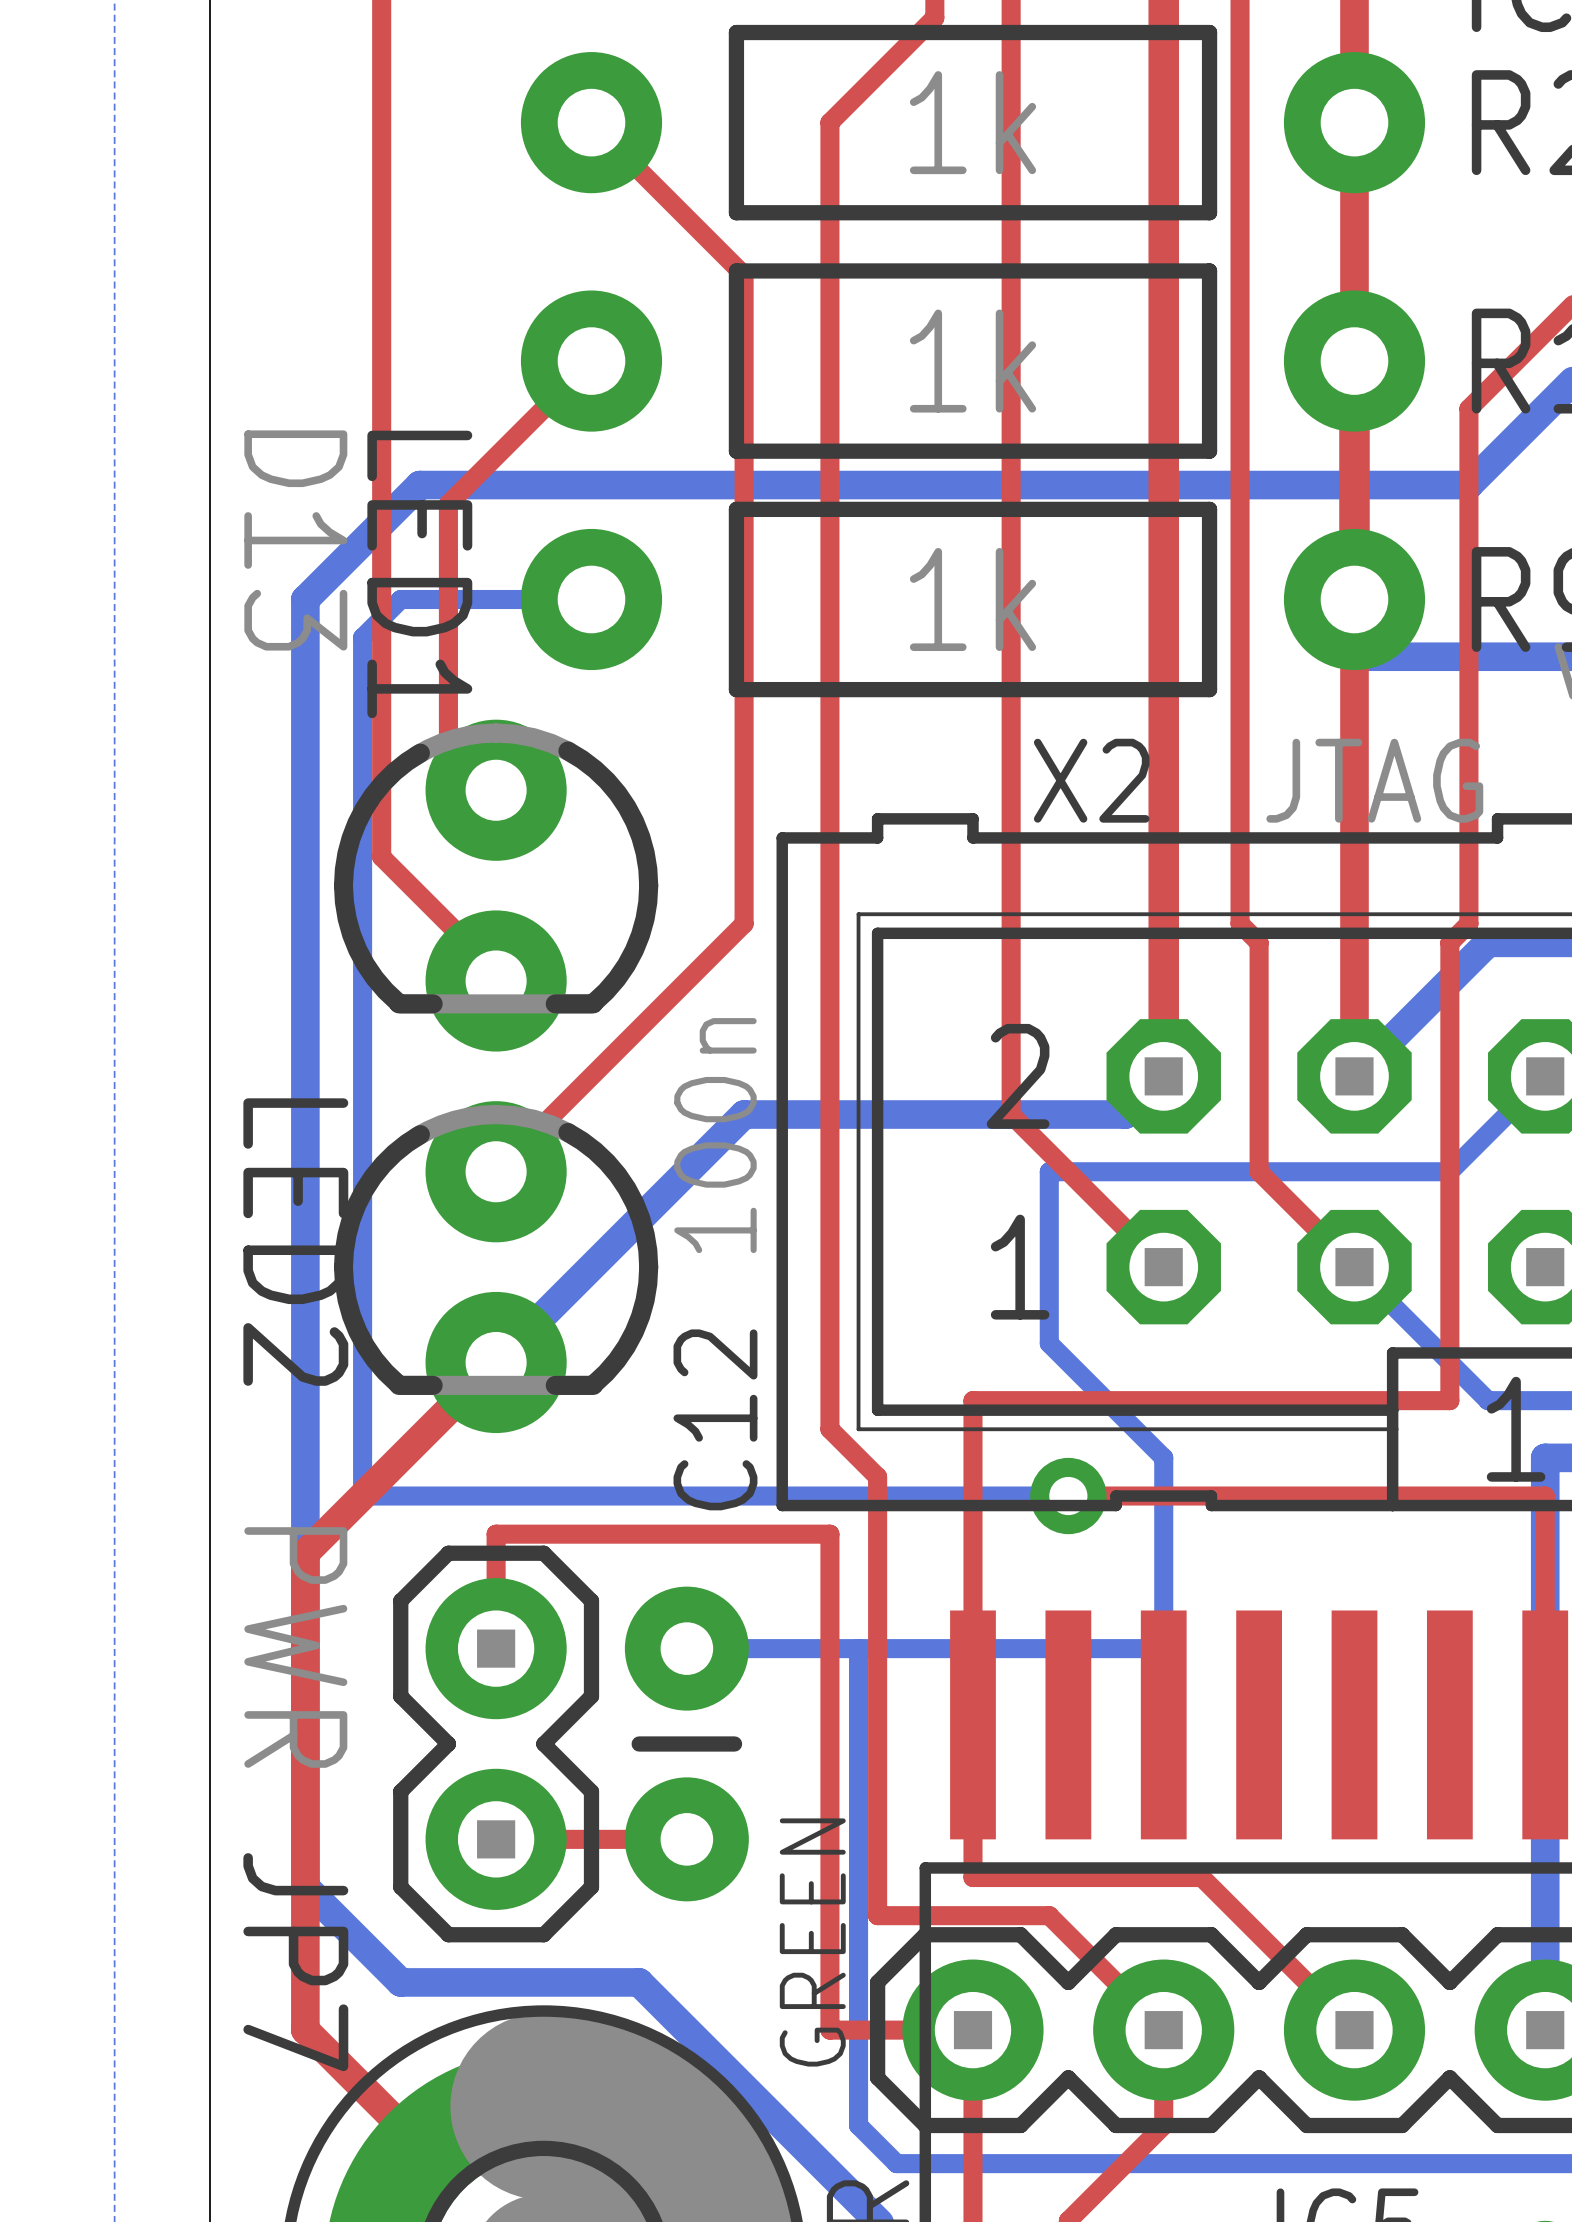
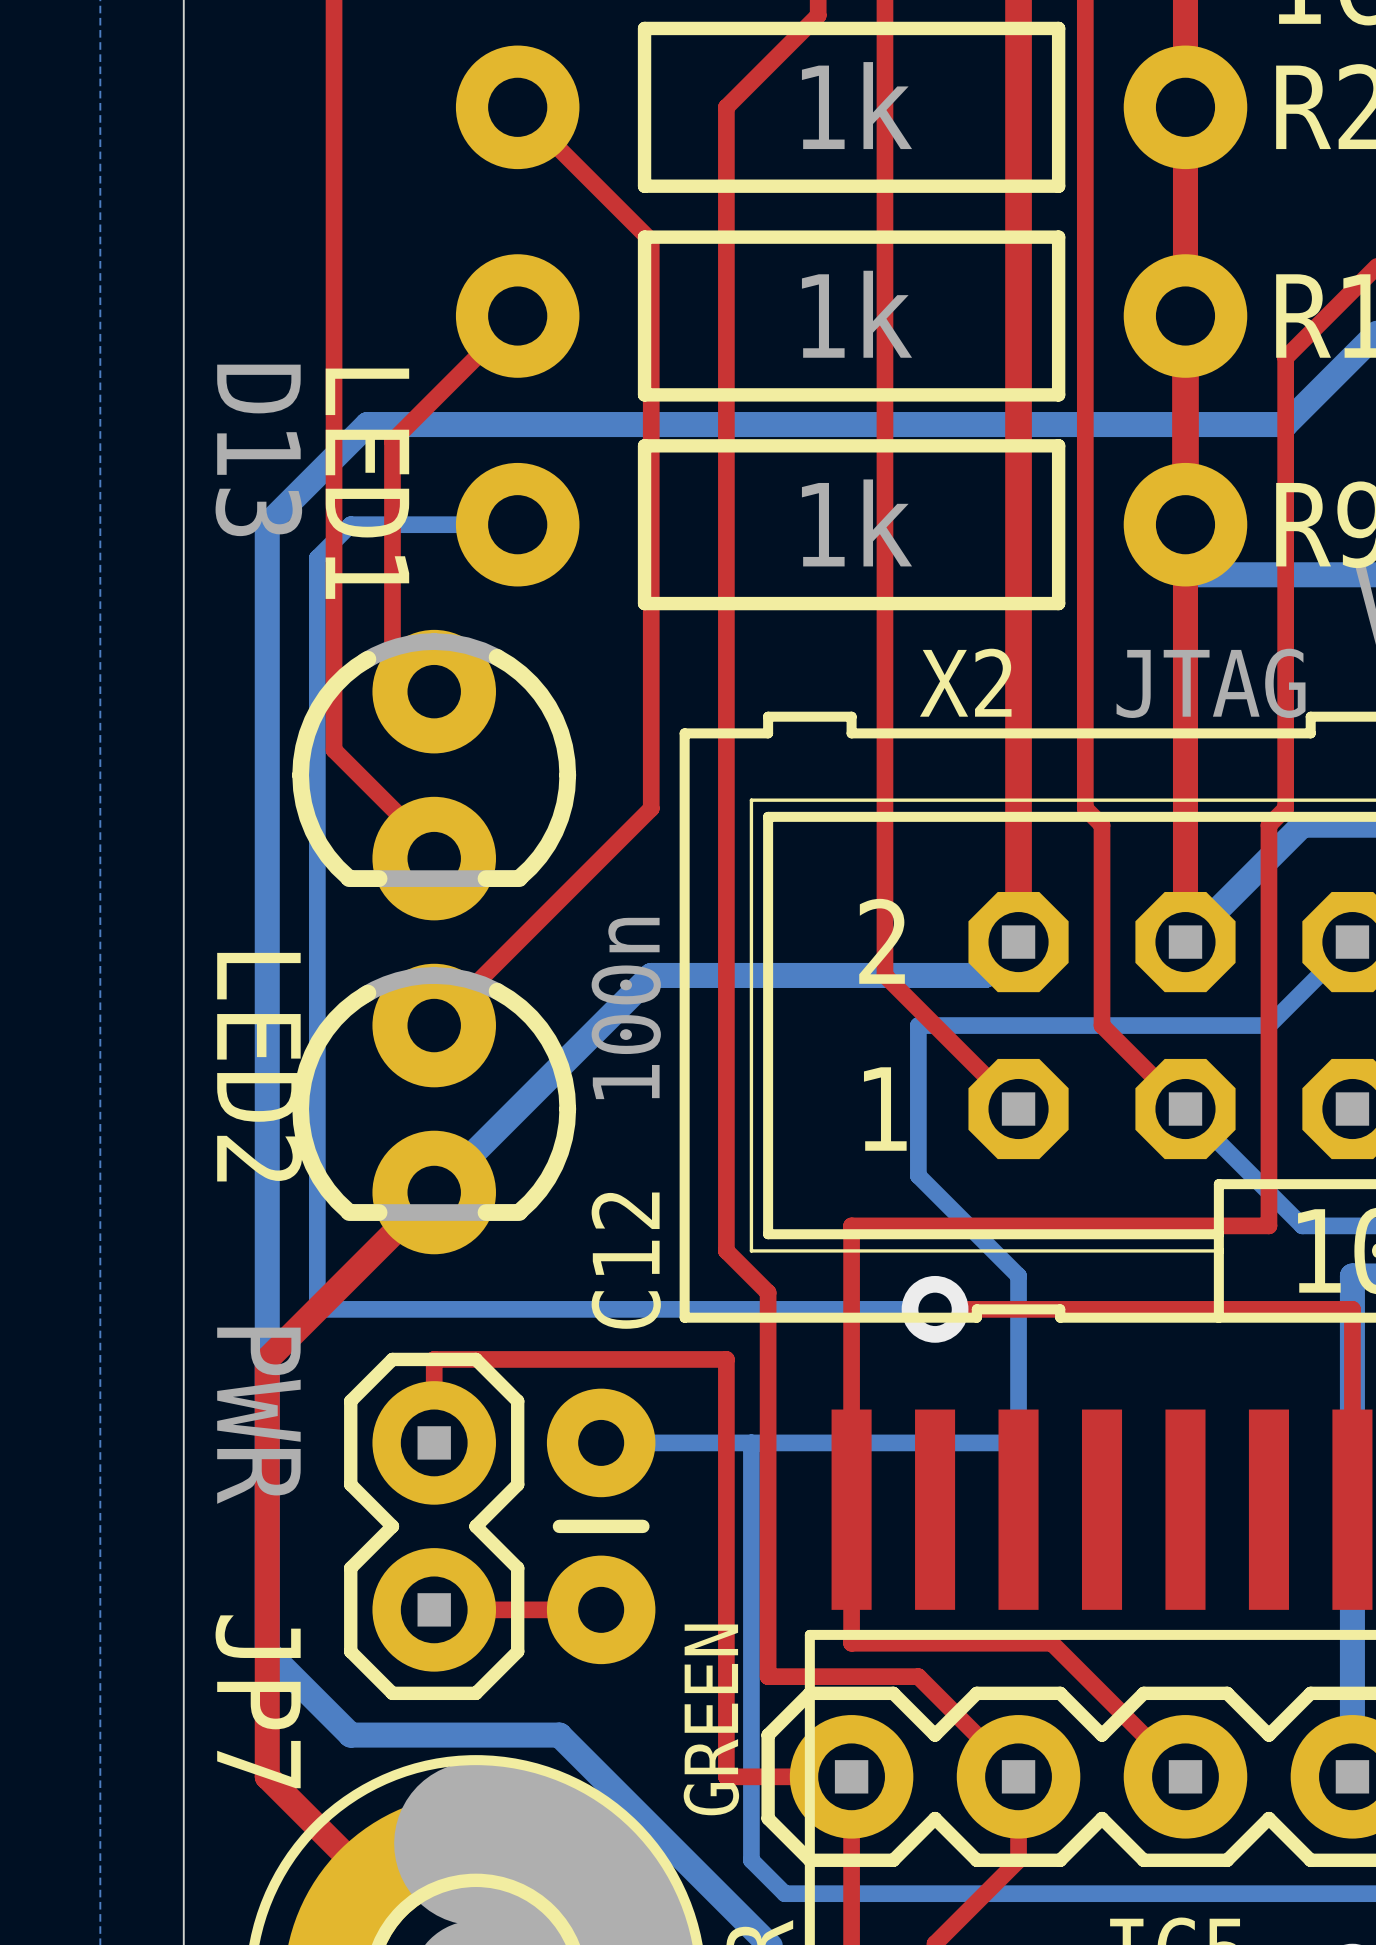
top track: (496, 1553) (496, 1534) (829, 1534) (829, 1553) -> (434, 1359) (726, 1359)

